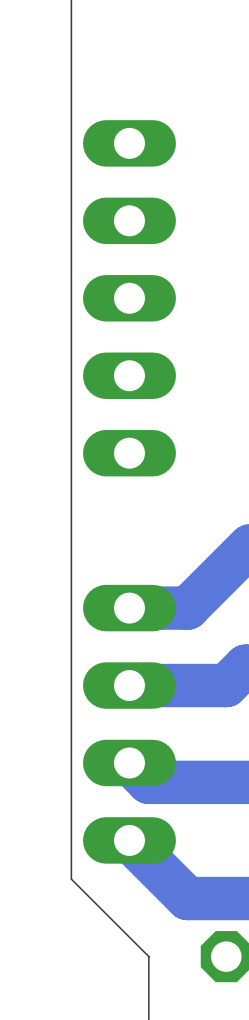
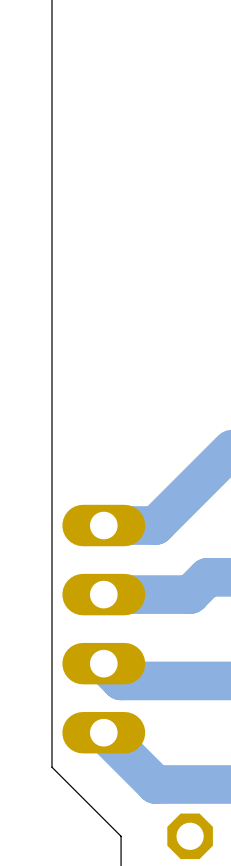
part: (129, 298) -> none

